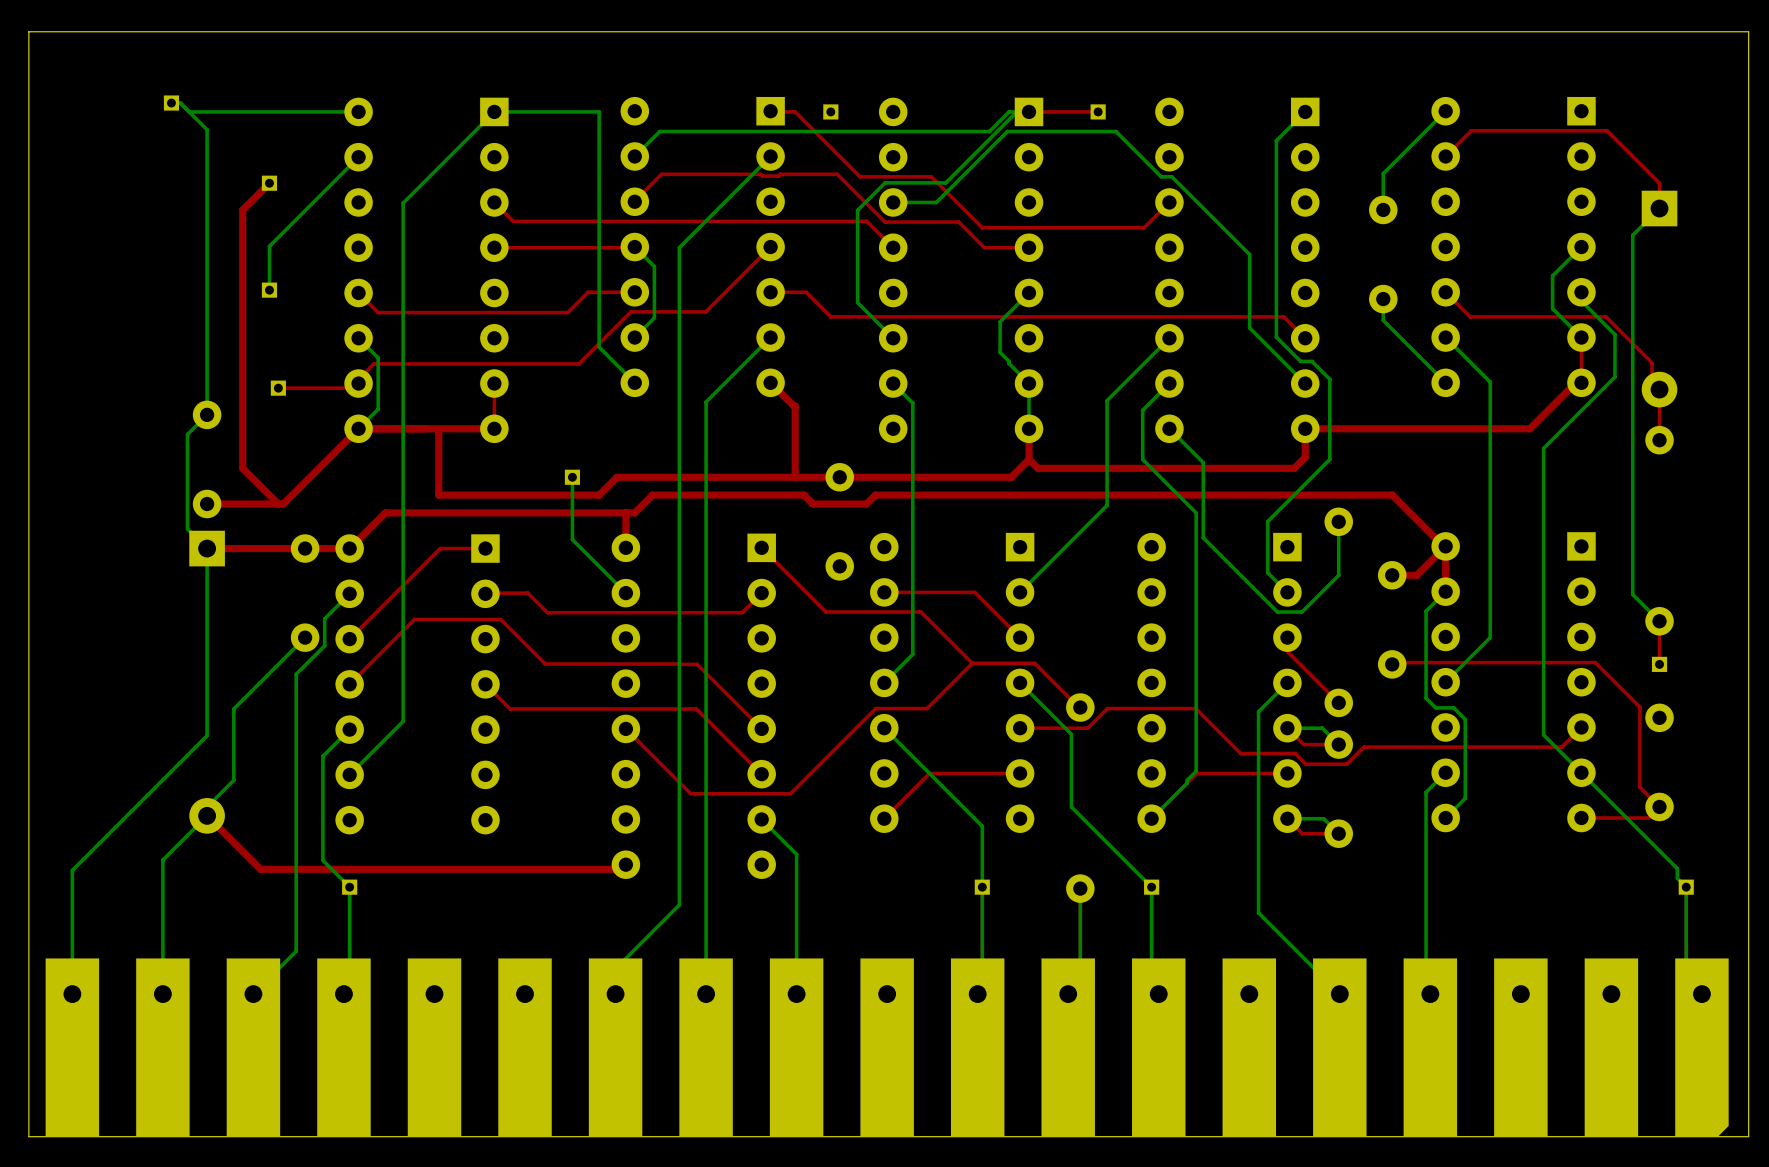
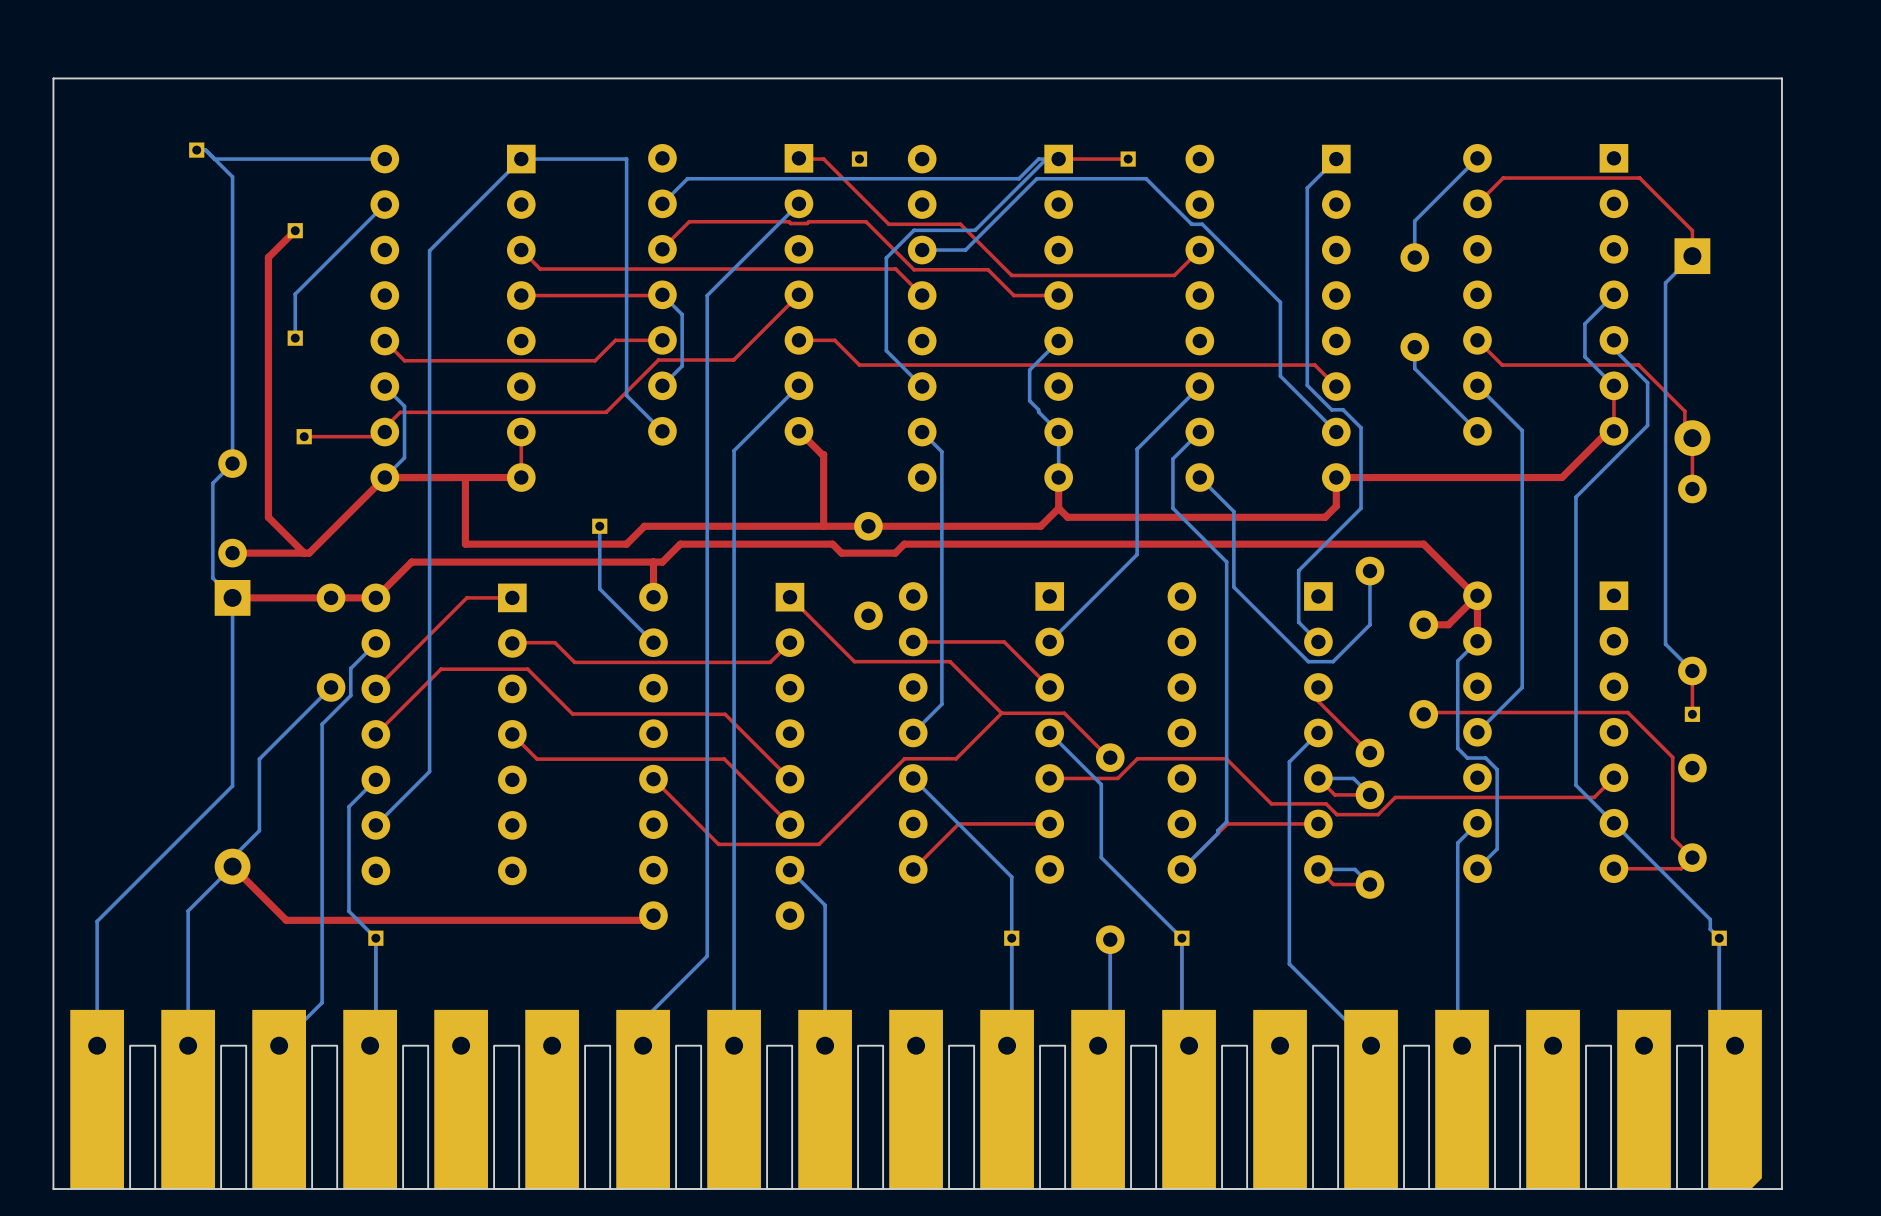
part footprint: [45, 958, 1729, 1137] -> [70, 1009, 1762, 1190]

